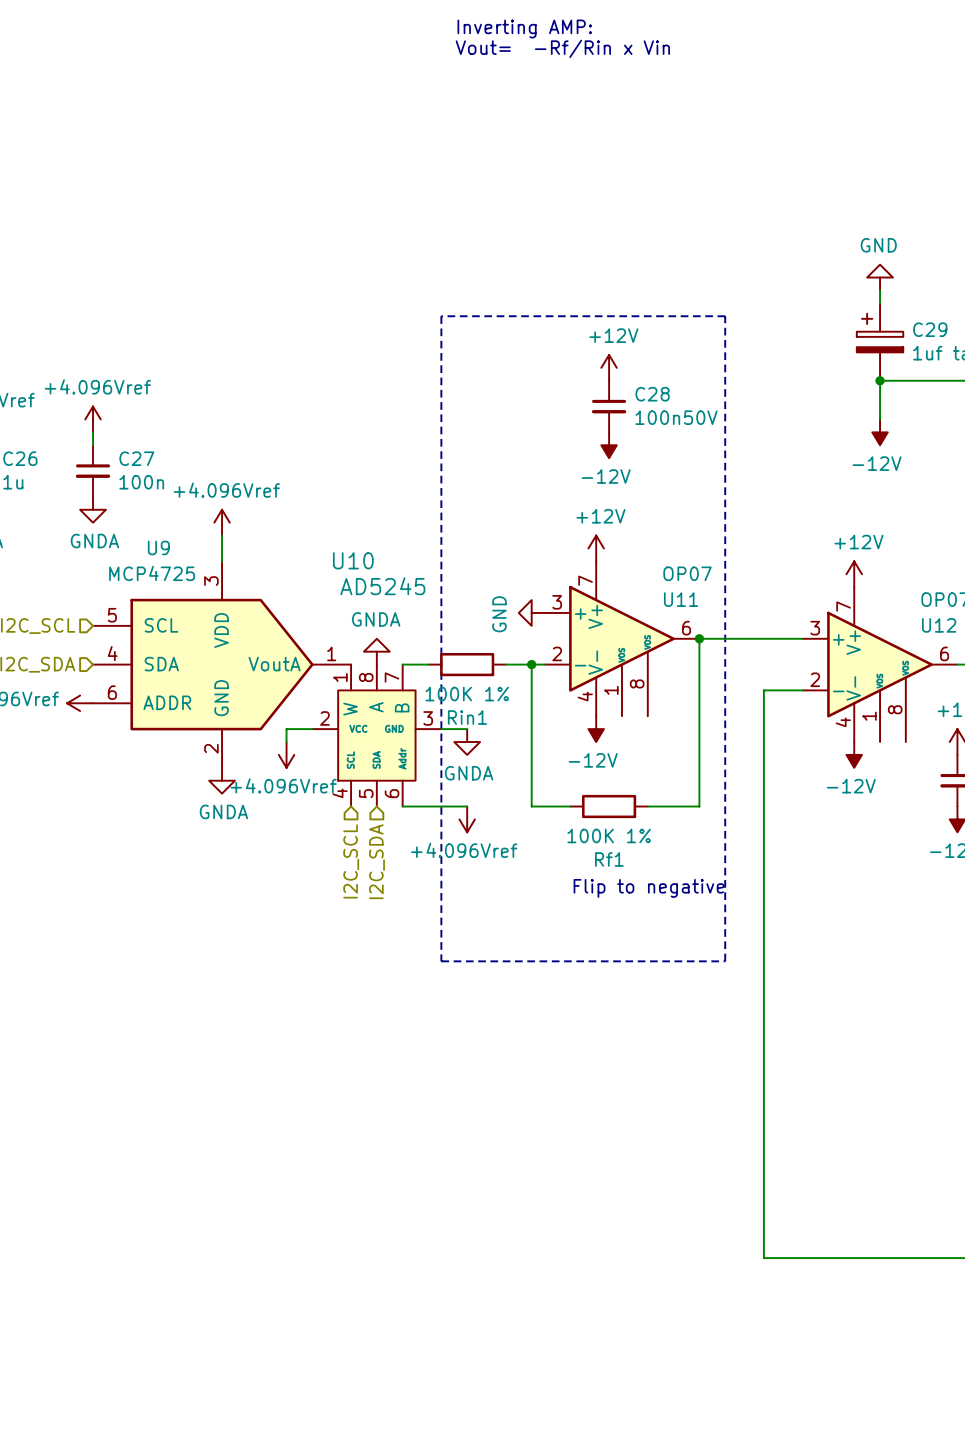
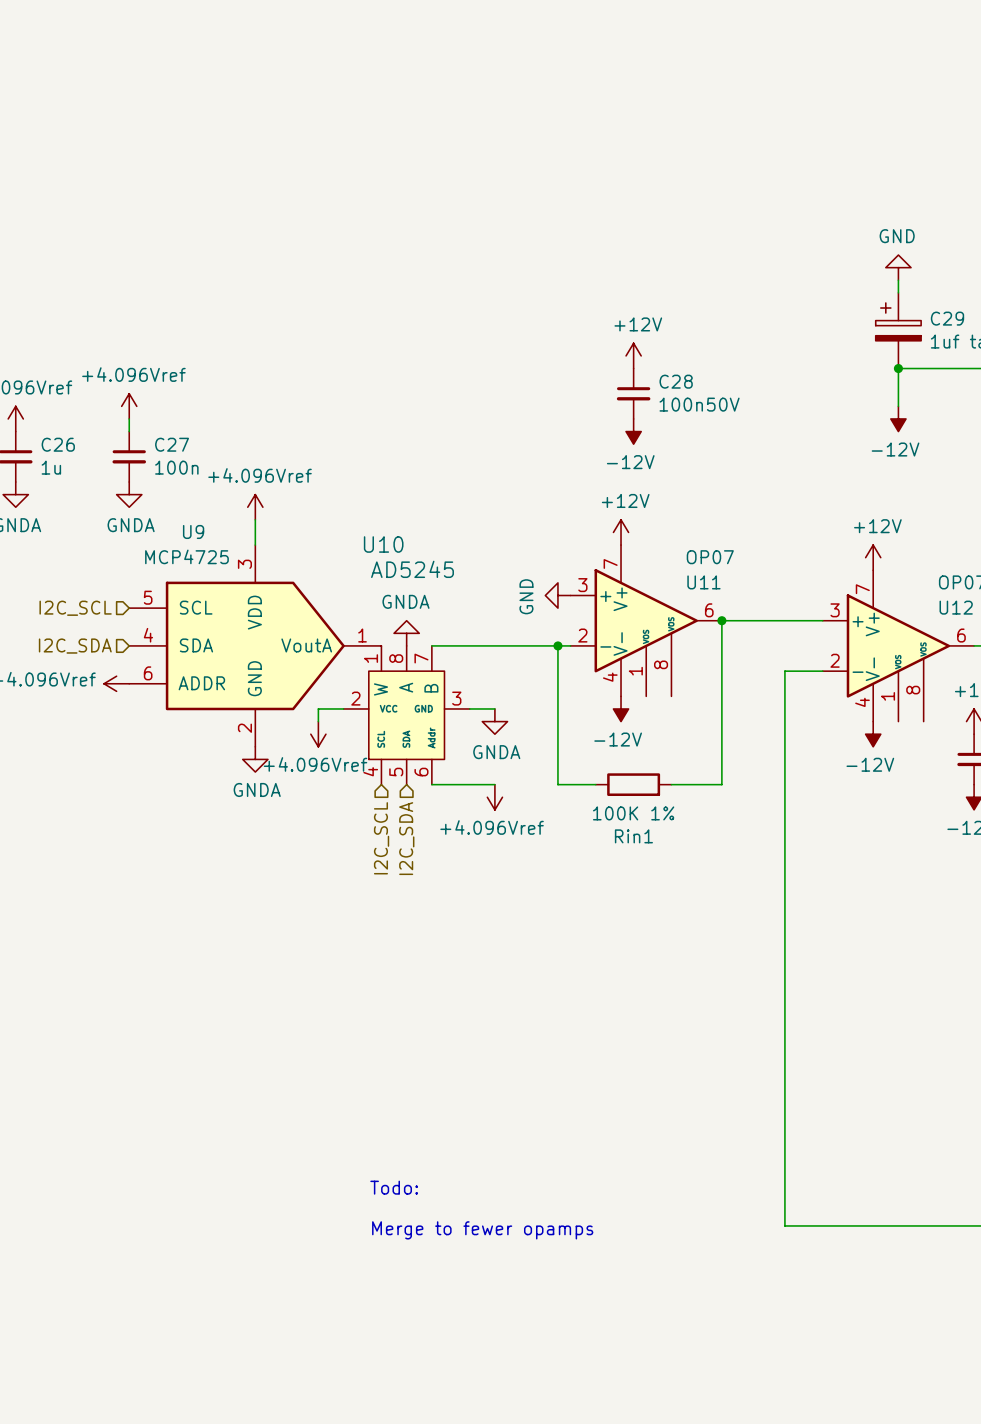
text: Inverting AMP: (524, 29) -> none
text: Vout= -Rf/Rin x Vin (562, 48) -> none
line: (441, 316) (725, 316) (725, 961) (441, 961) (441, 316) -> none
wire: none -> (457, 645) (532, 645)
Rin1: 100K 1% (467, 664) -> none
Rf1 name: Rf1 (609, 859) -> Rin1 (633, 836)
text: Flip to negative (649, 888) -> none
text: none -> Todo: (394, 1187)
text: none -> Merge to fewer opamps (482, 1230)

